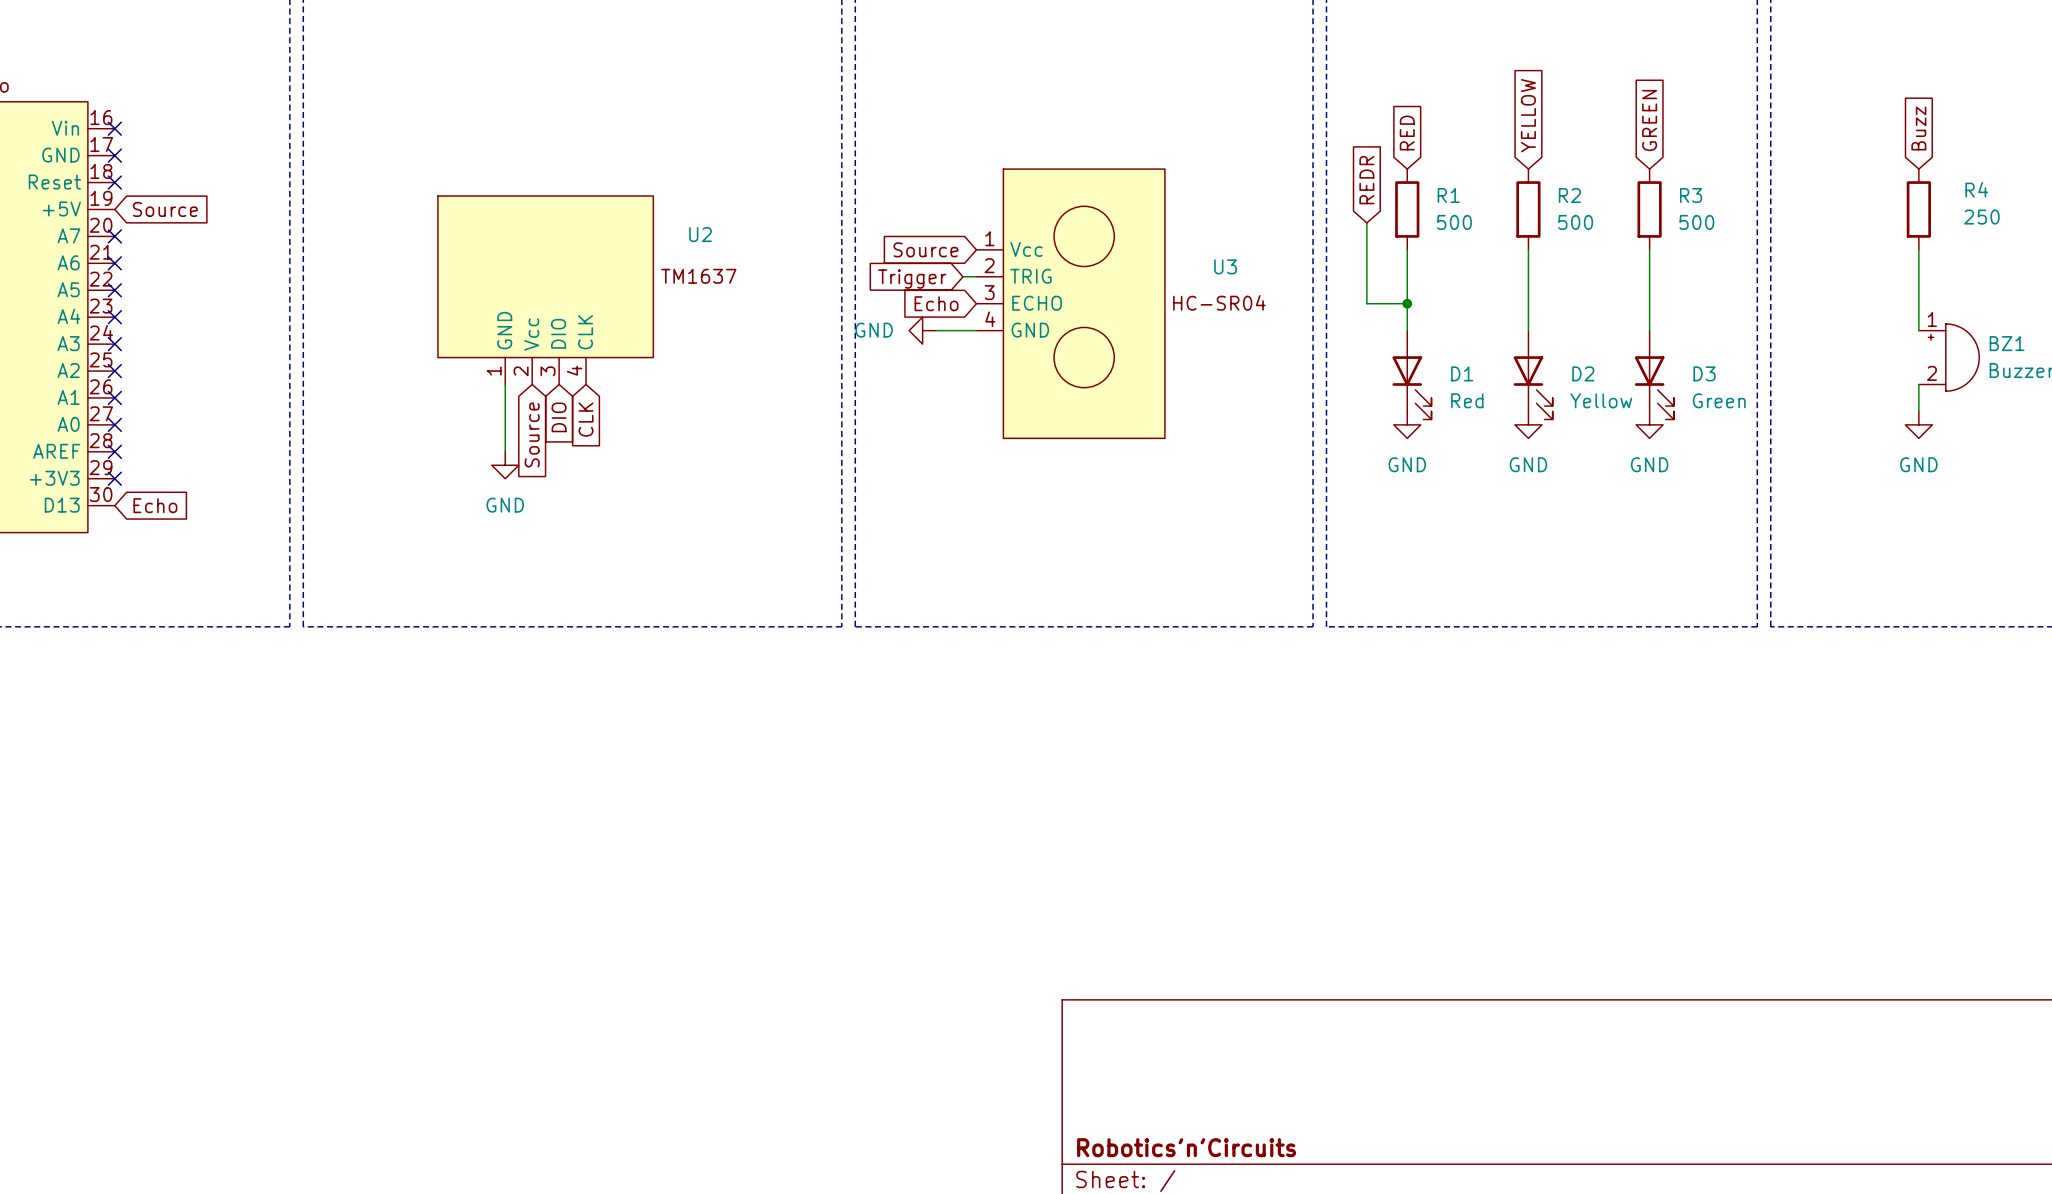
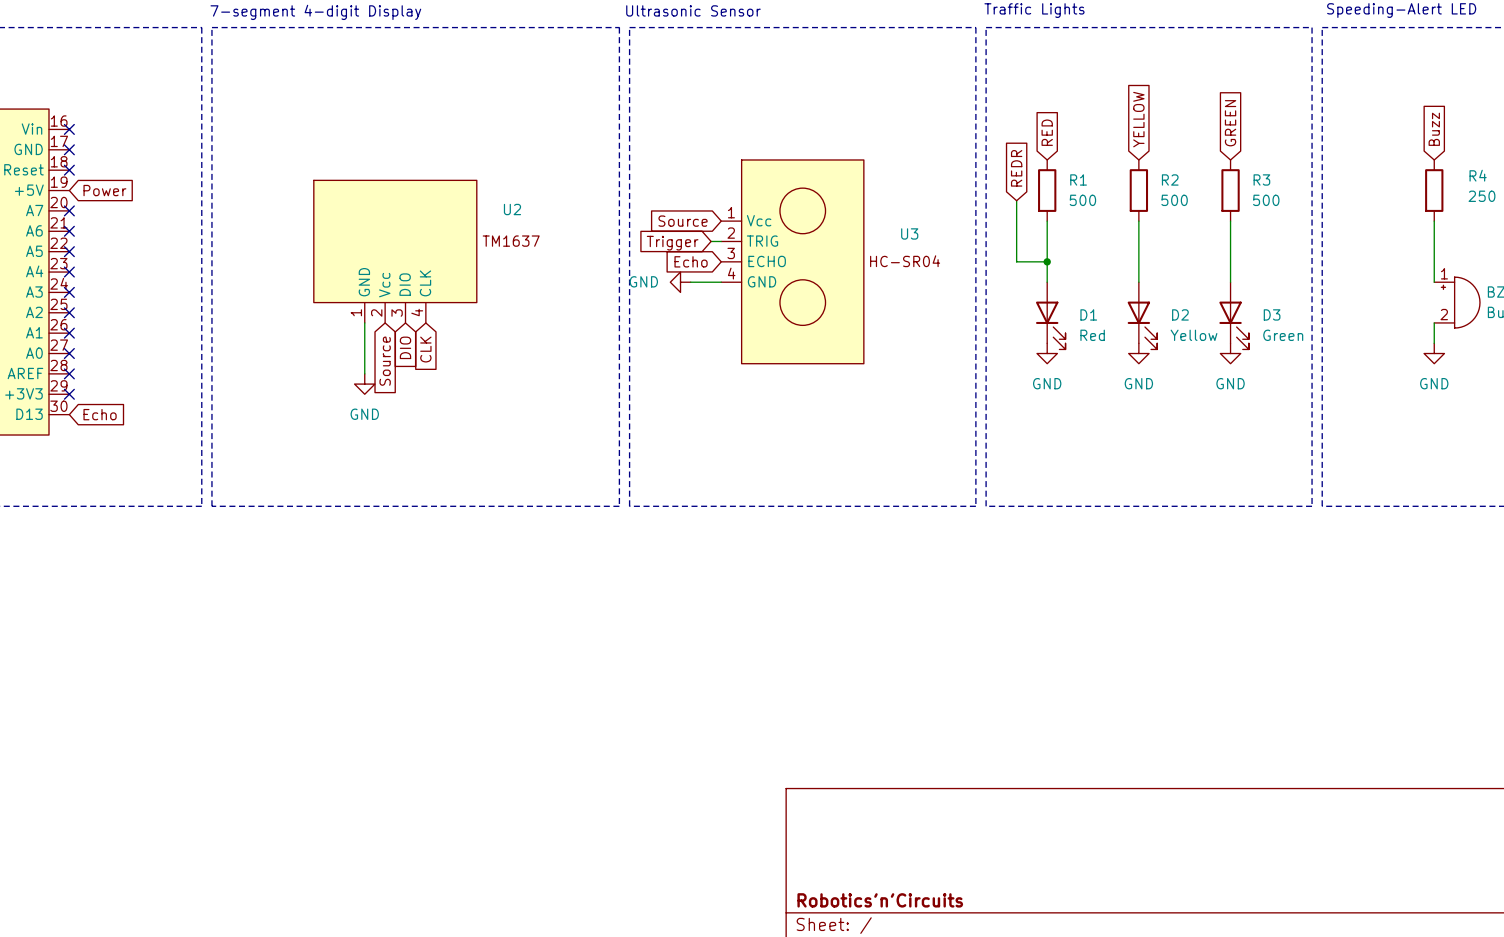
global label: Source (165, 209) -> Power (104, 190)

